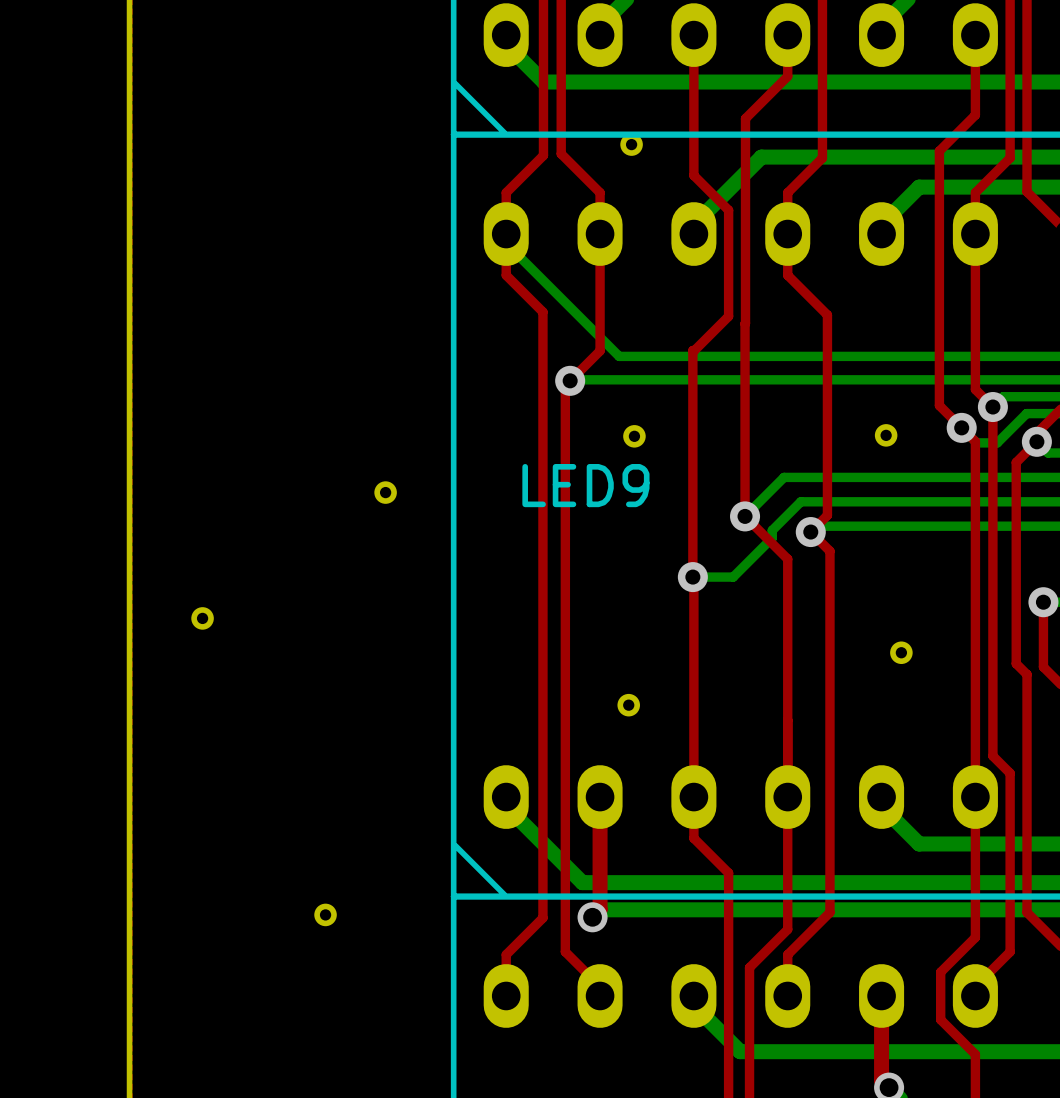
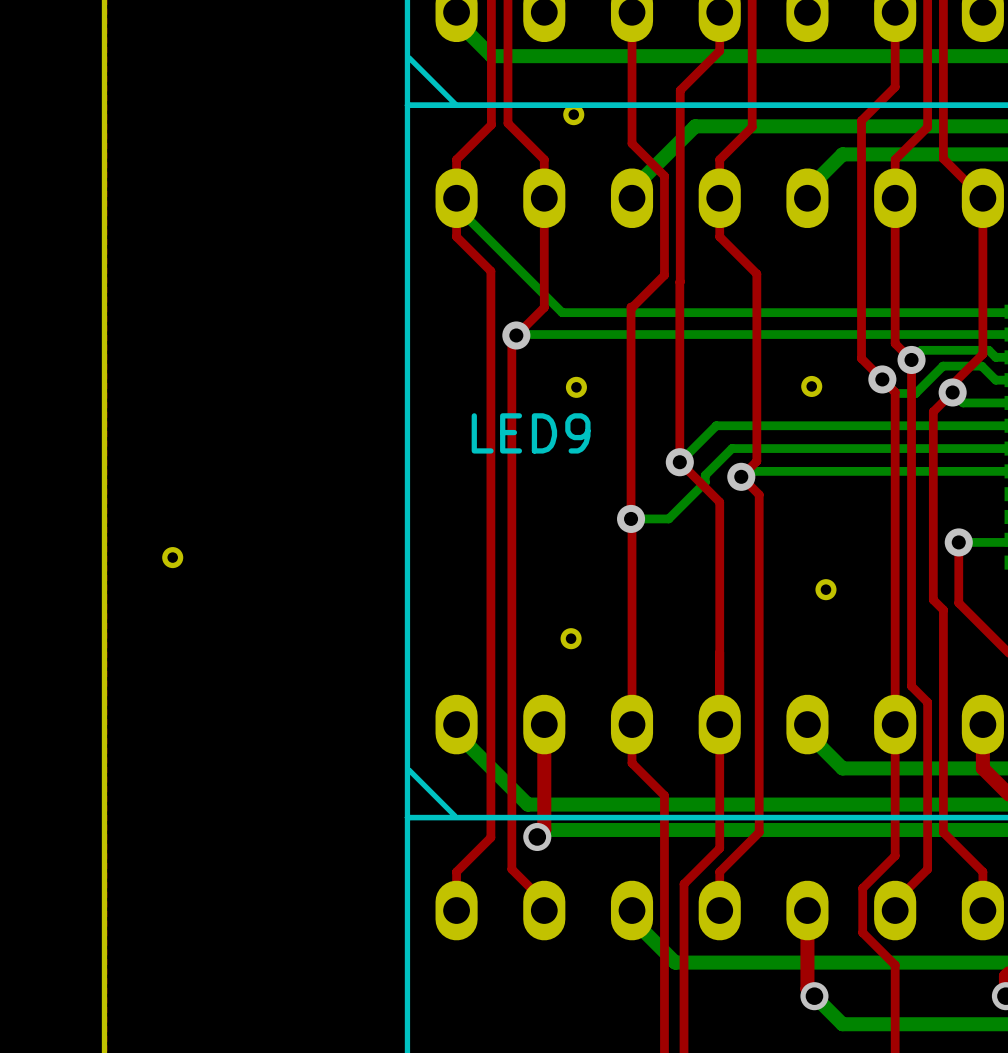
part: (385, 492) -> none
part: (325, 914) -> none

